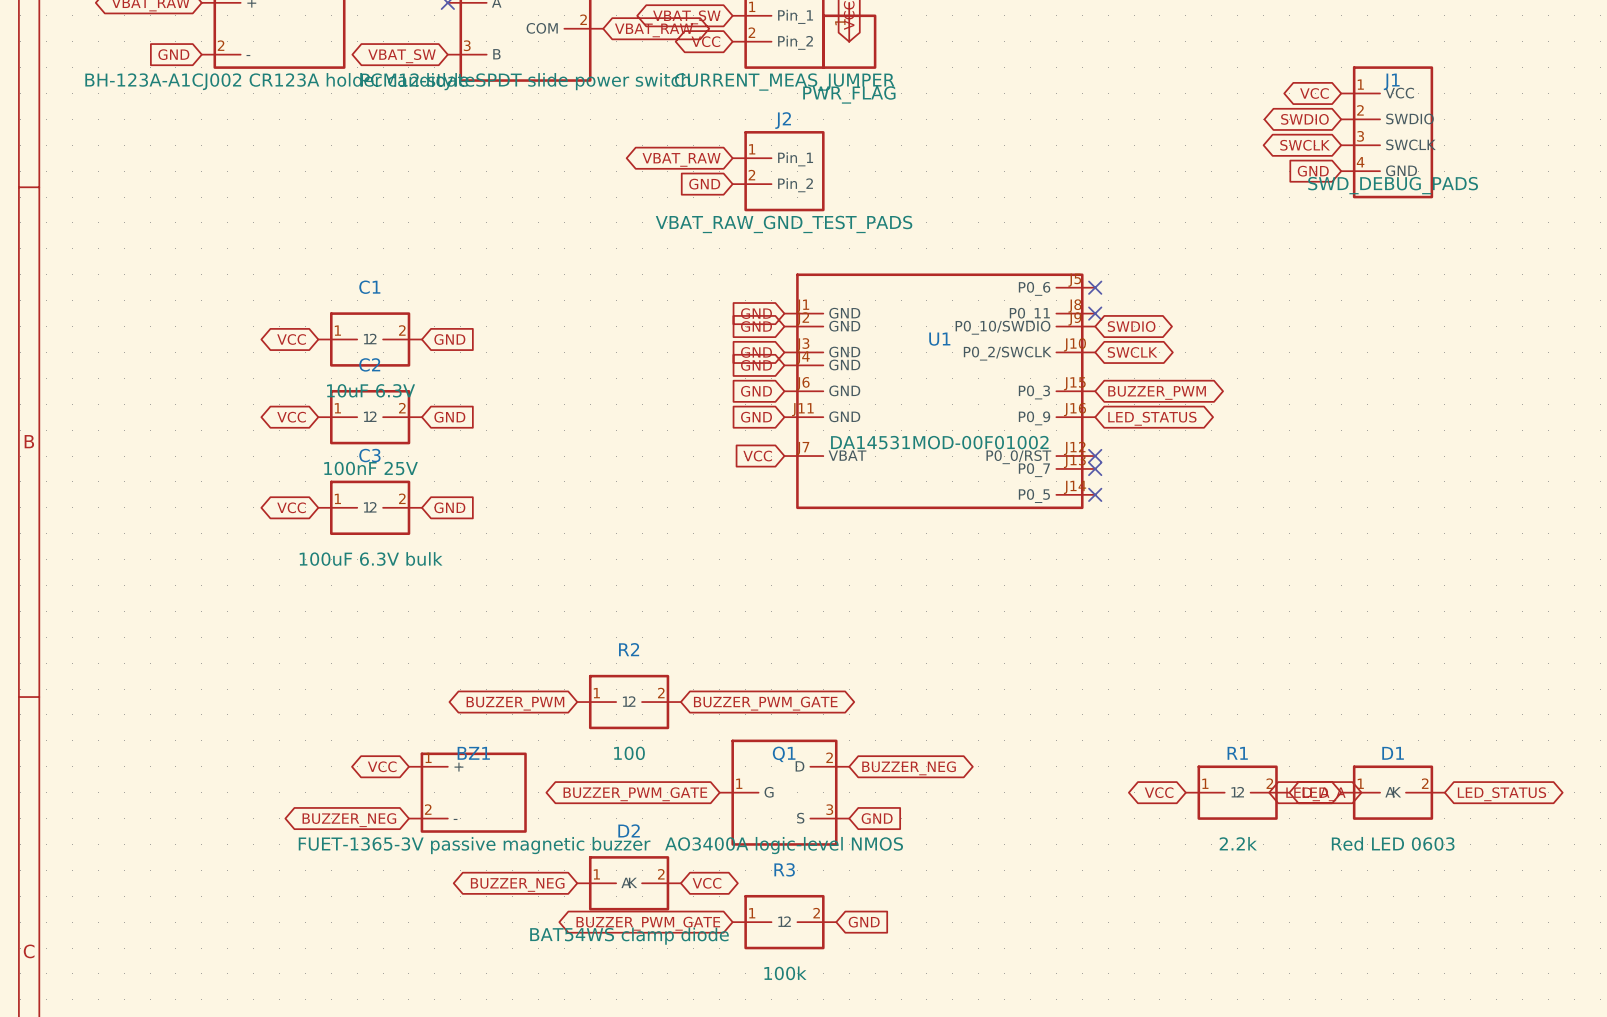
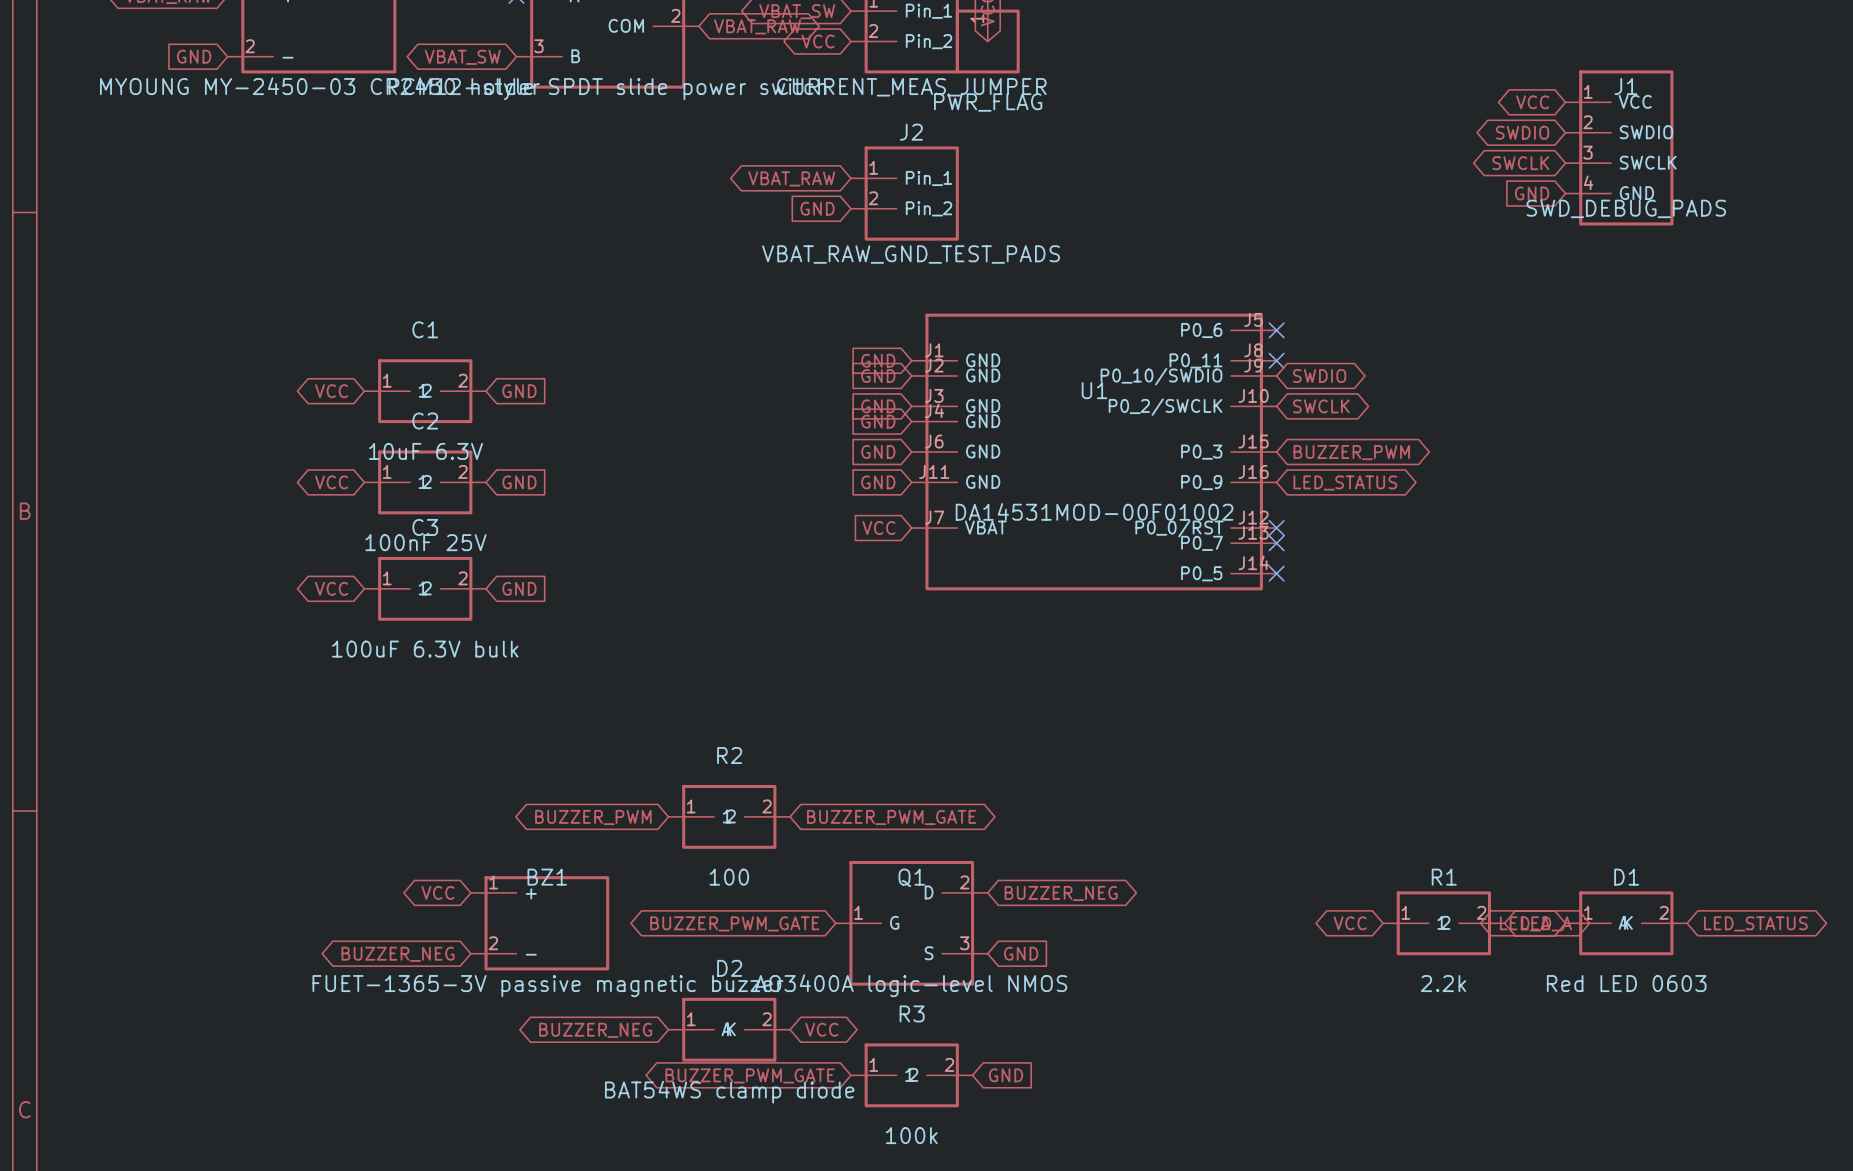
part value: BH-123A-A1CJ002 CR123A holder candidate (279, 81) -> MYOUNG MY-2450-03 CR2450 holder (319, 86)

